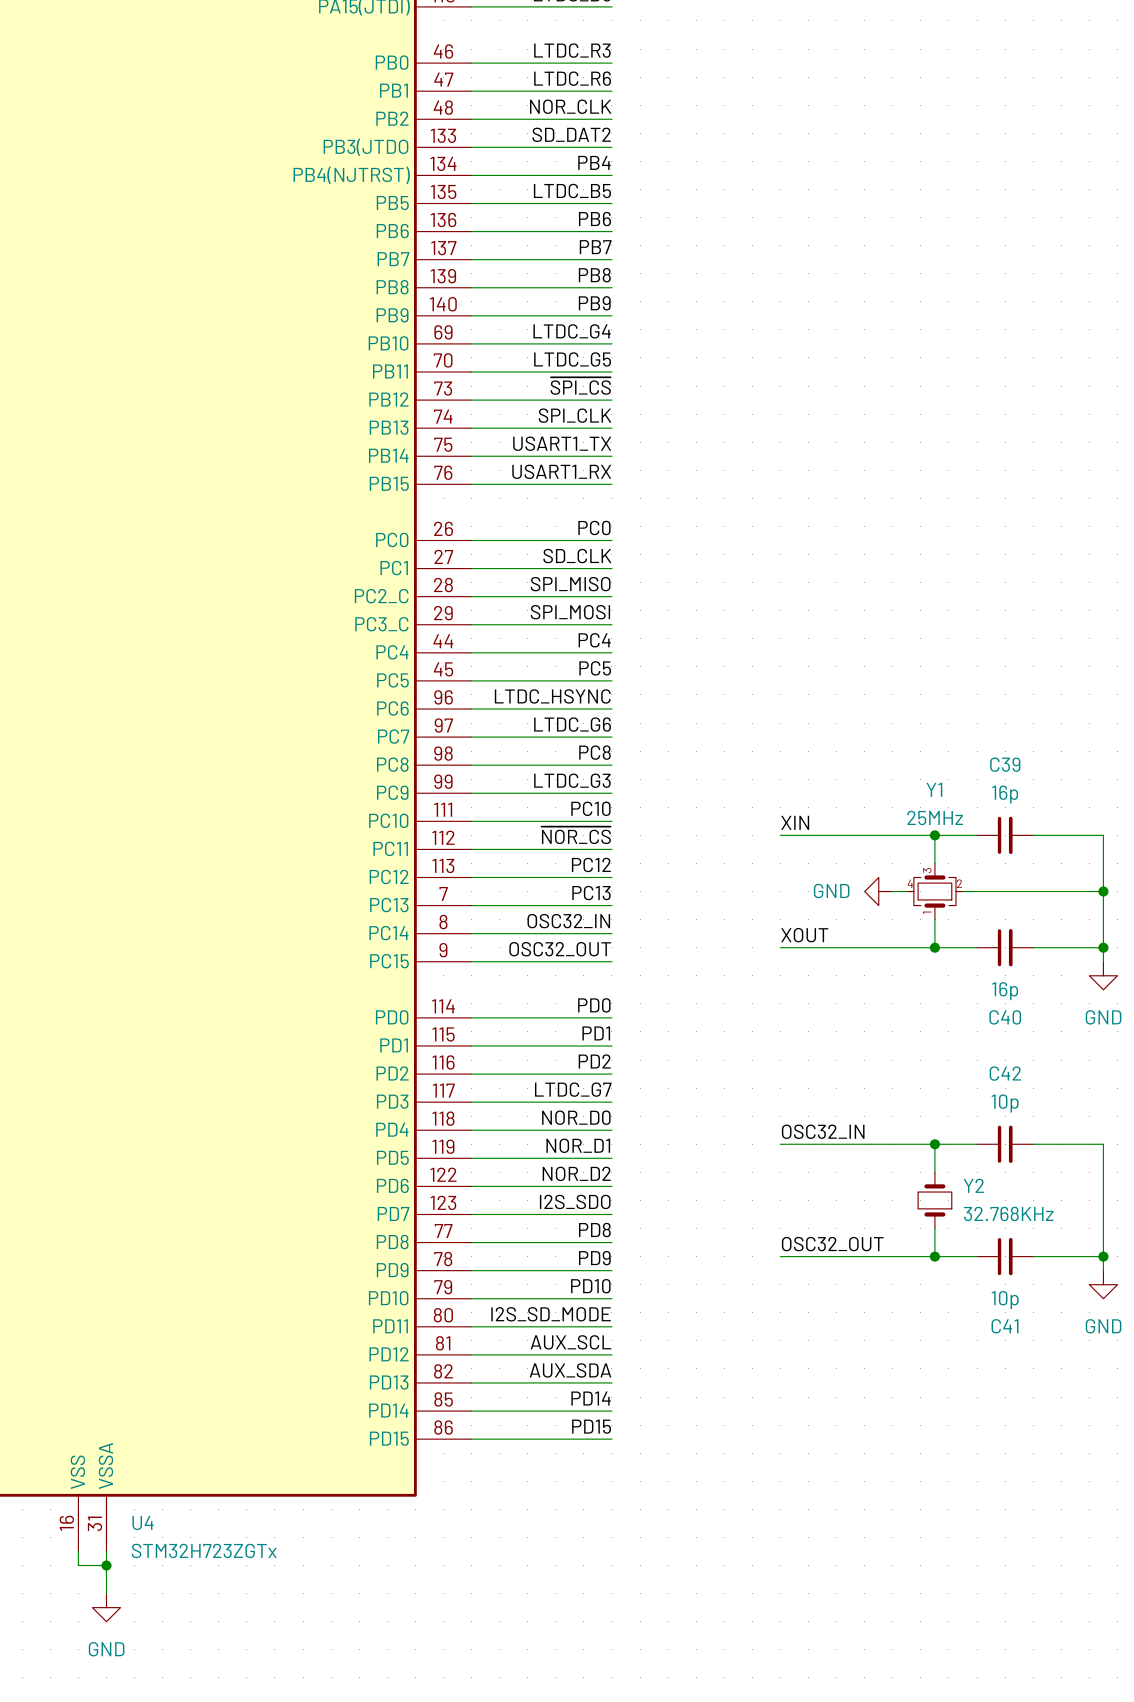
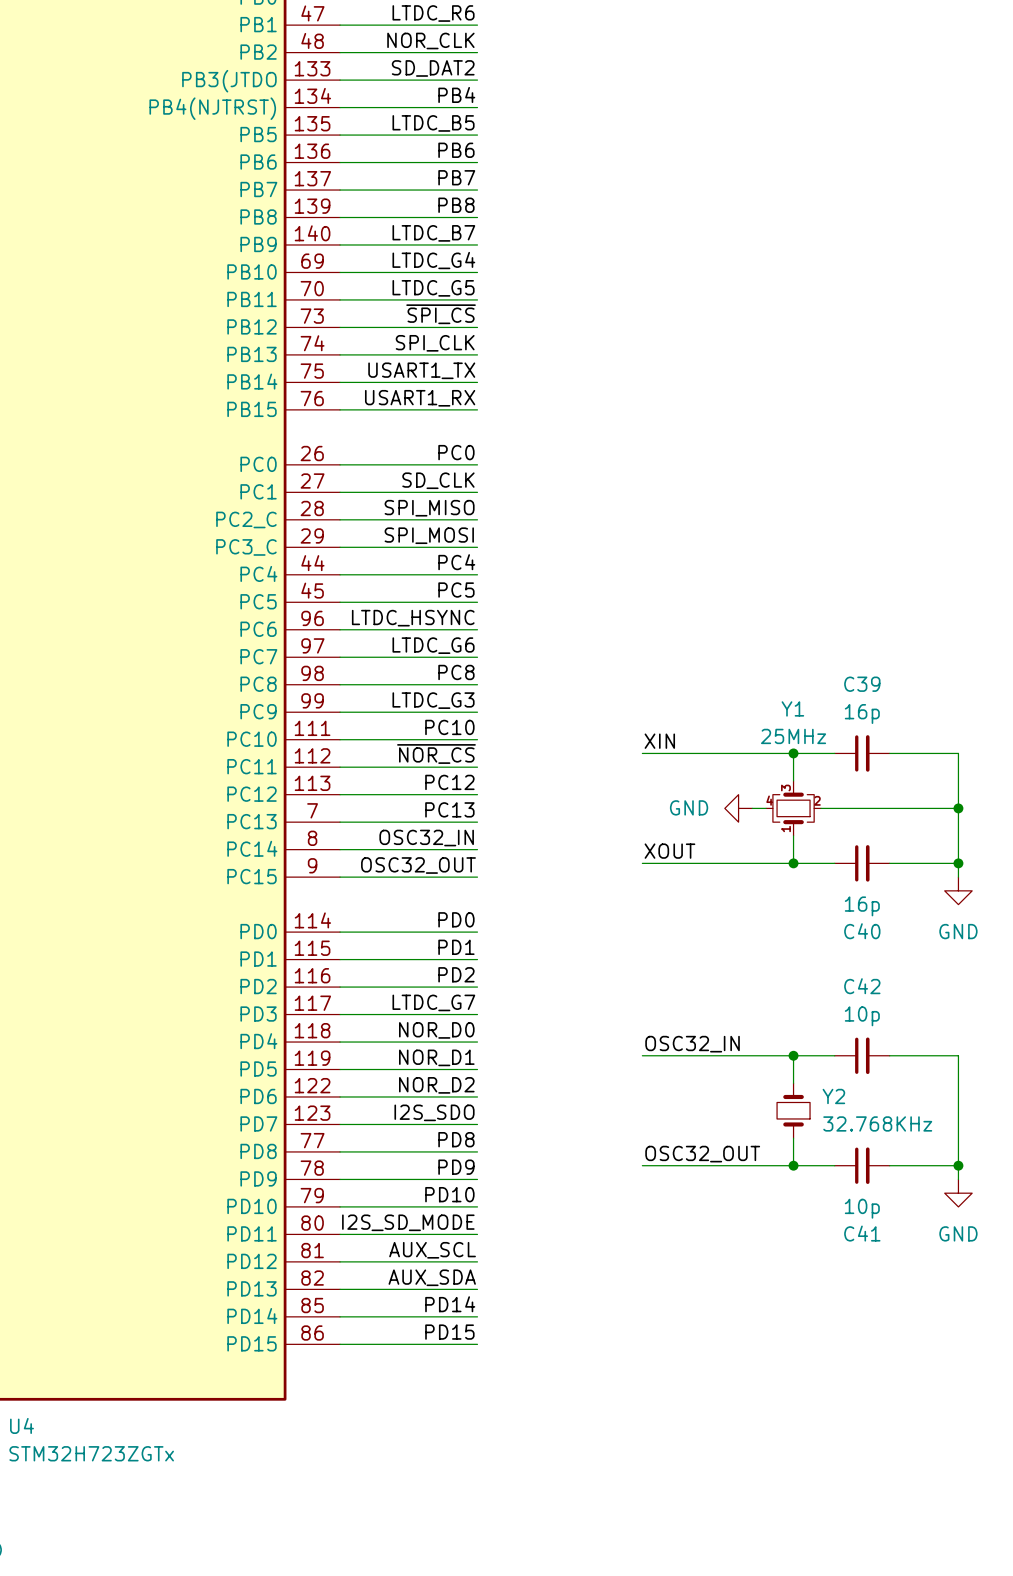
label: PB9 (594, 303) -> LTDC_B7 (433, 233)

